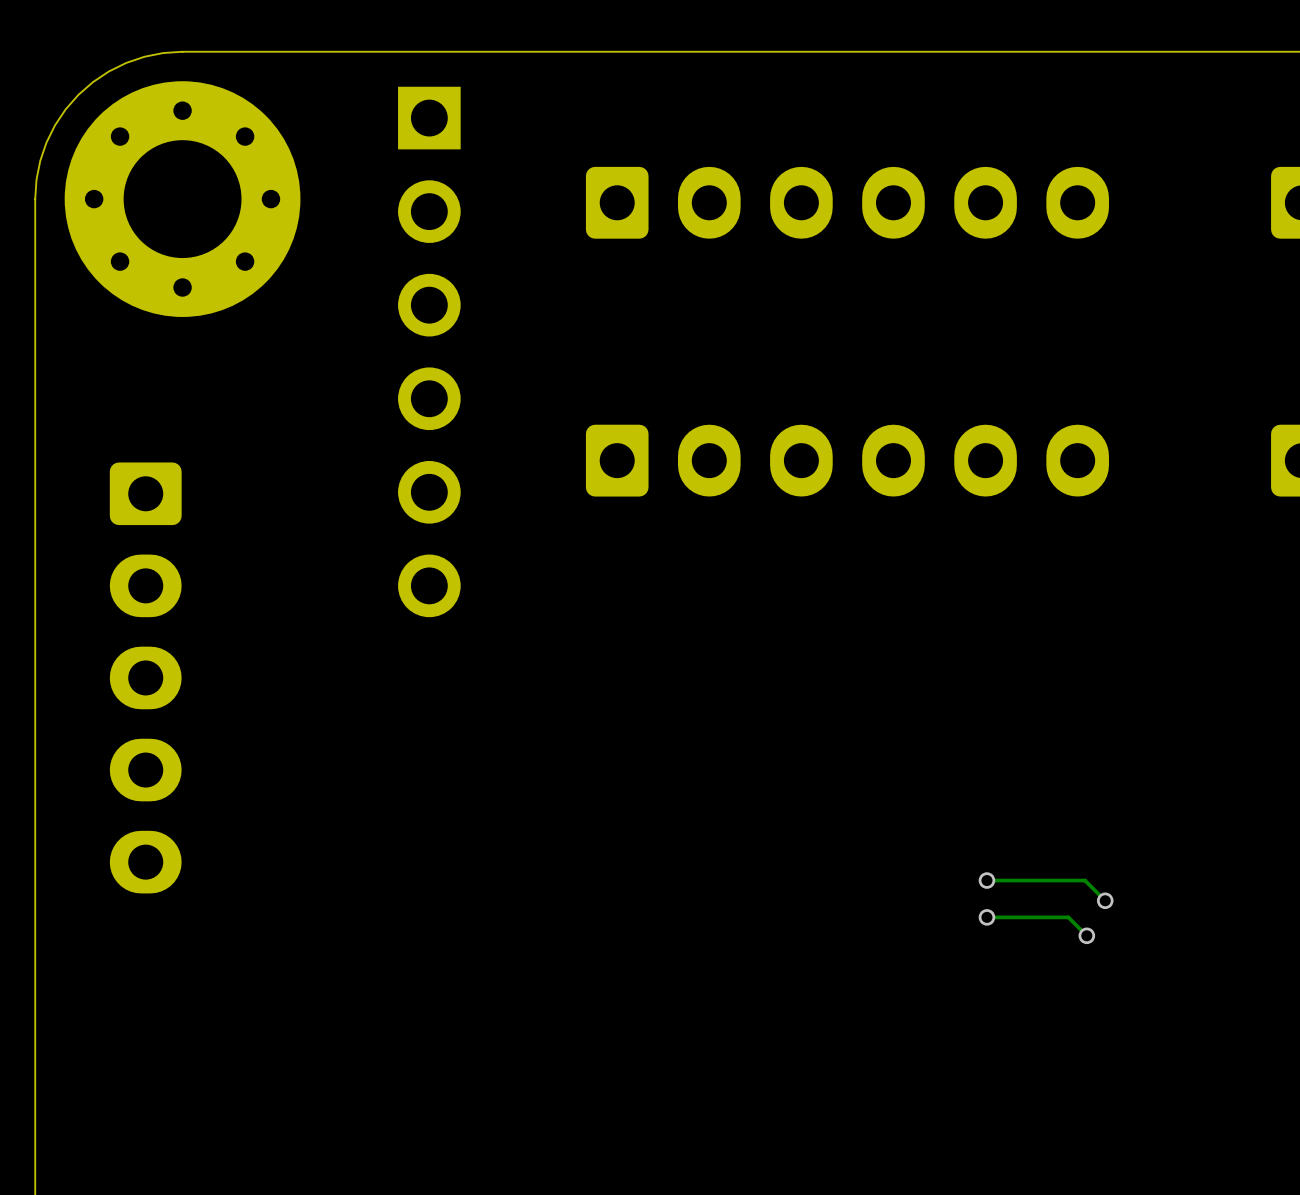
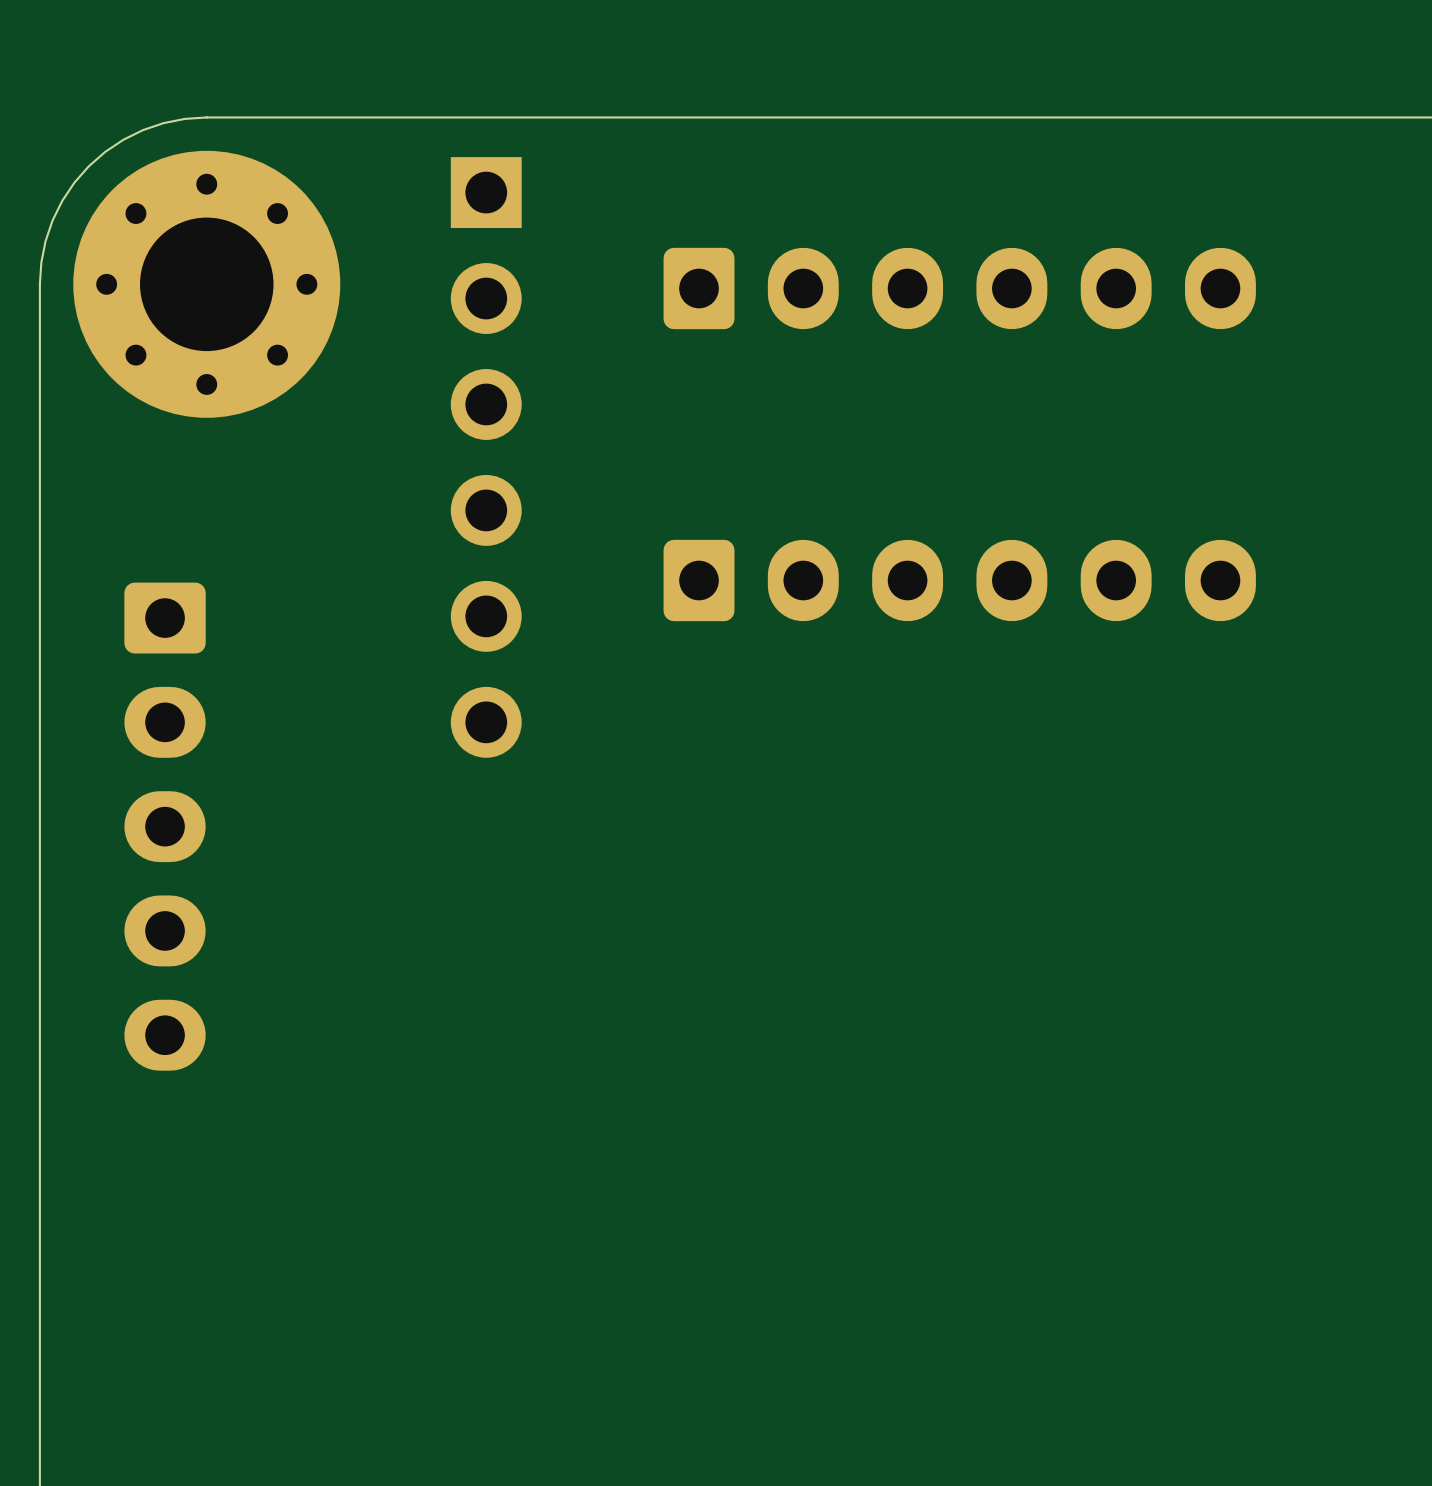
track: (986, 880) (1085, 880) (1105, 900) -> none
via: (986, 880) -> none
via: (1105, 900) -> none
track: (986, 917) (1068, 917) (1086, 935) -> none
via: (986, 917) -> none
via: (1086, 935) -> none

